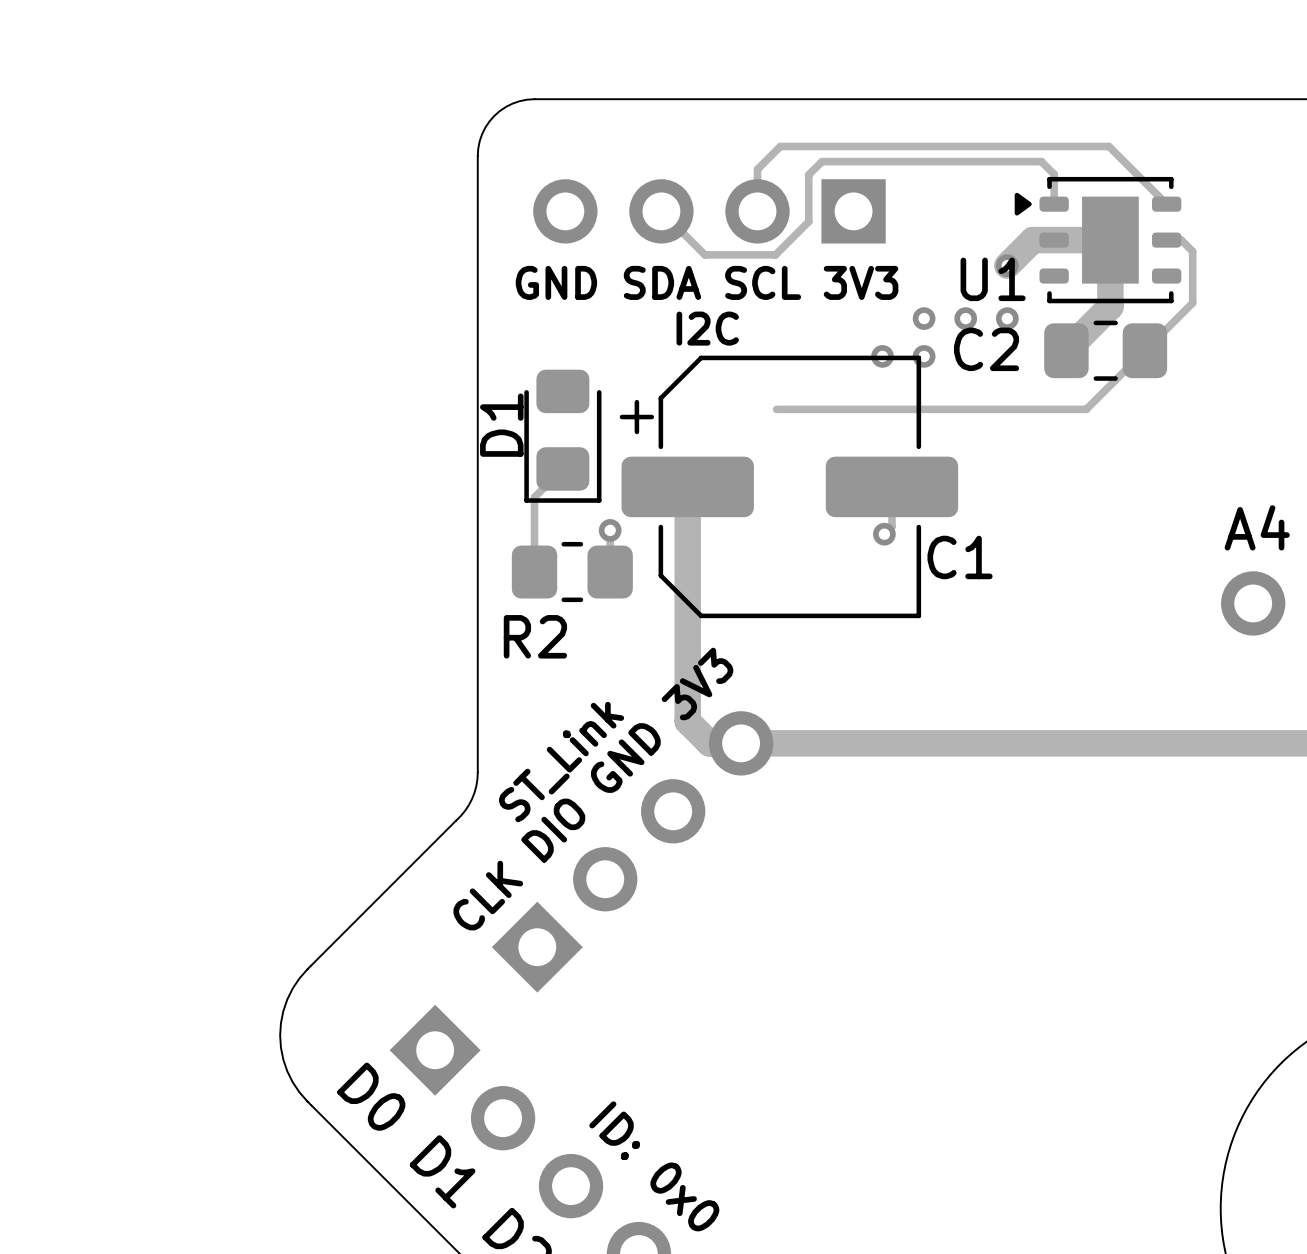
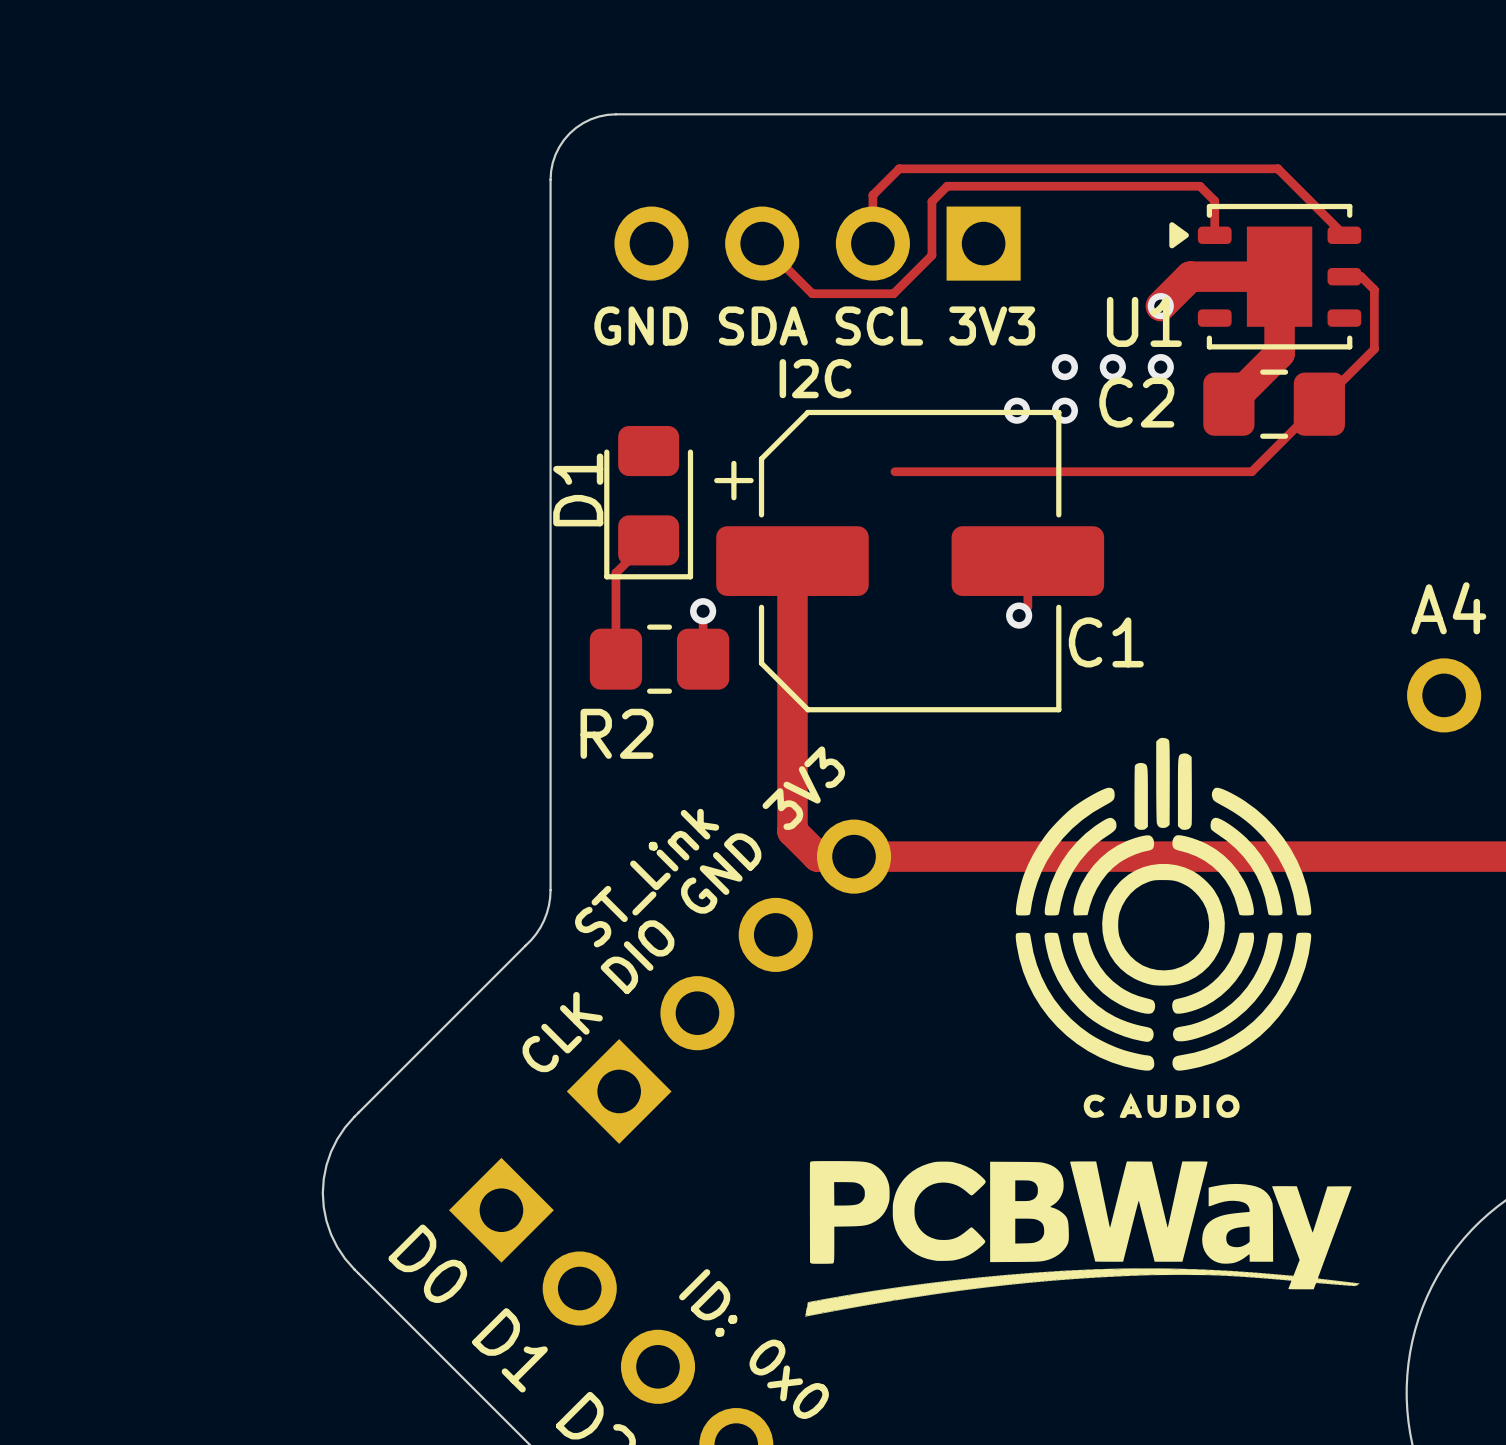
drawing: none -> [805, 737, 1360, 1317]

